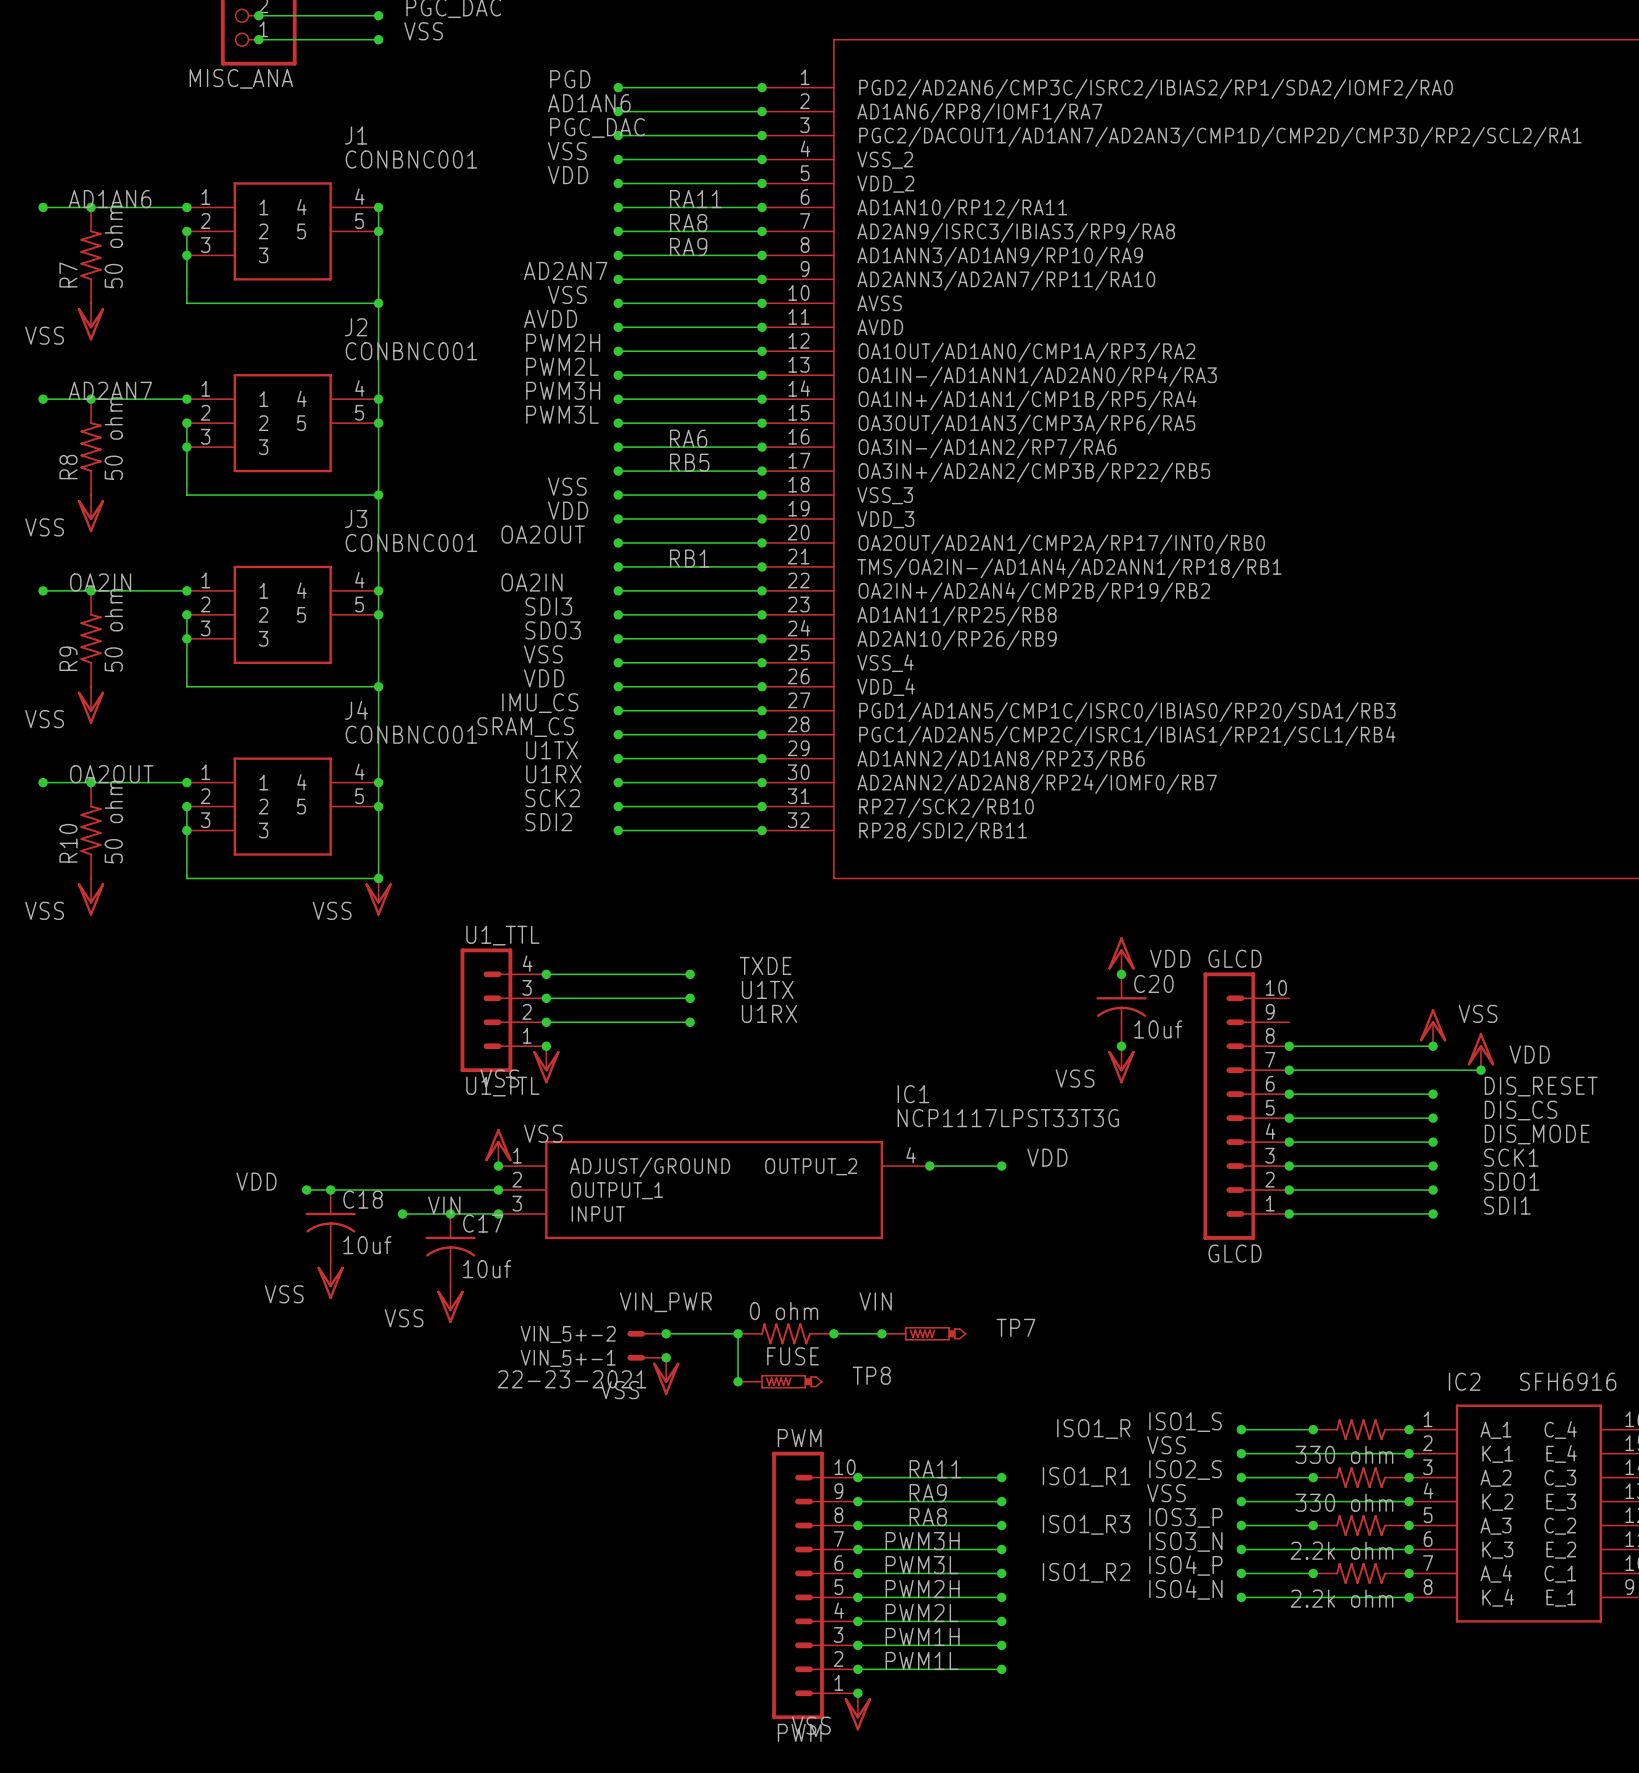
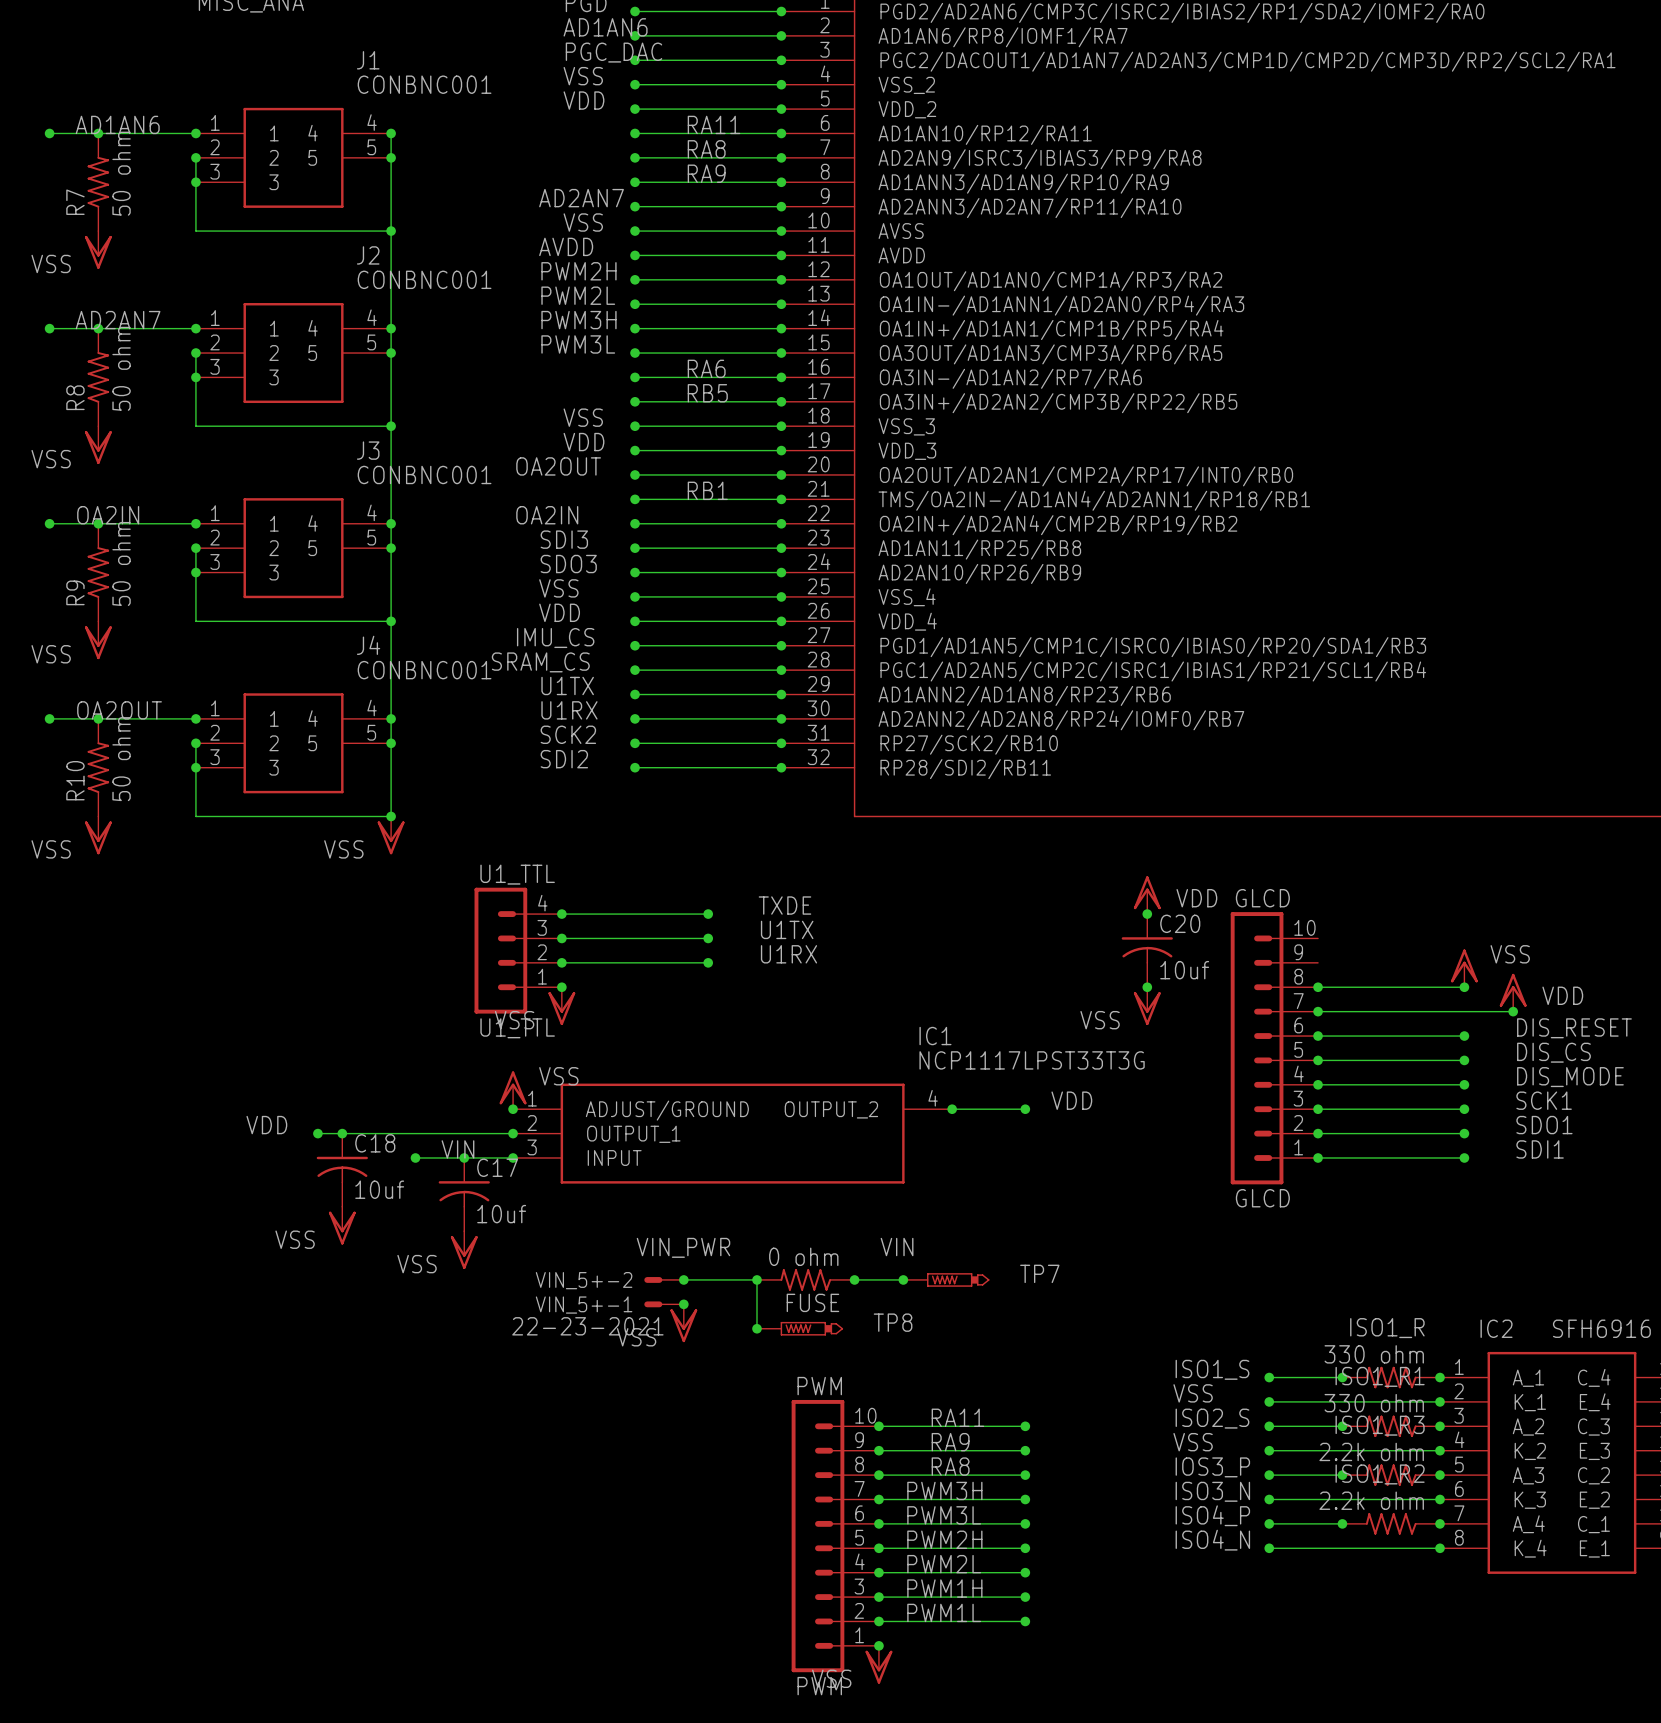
ISO1_R name position: ISO1_R (1093, 1429) -> ISO1_R (1387, 1328)
ISO1_R value position: 330 ohm (1344, 1454) -> 330 ohm (1374, 1354)
ISO1_R1 name position: ISO1_R1 (1086, 1476) -> ISO1_R1 (1380, 1376)
ISO1_R1 value position: 330 ohm (1344, 1502) -> 330 ohm (1374, 1403)
ISO1_R3 name position: ISO1_R3 (1086, 1524) -> ISO1_R3 (1380, 1425)
ISO1_R3 value position: 2.2k ohm (1341, 1550) -> 2.2k ohm (1371, 1451)
ISO1_R2 name position: ISO1_R2 (1086, 1572) -> ISO1_R2 (1380, 1474)
ISO1_R2 value position: 2.2k ohm (1341, 1598) -> 2.2k ohm (1371, 1500)

